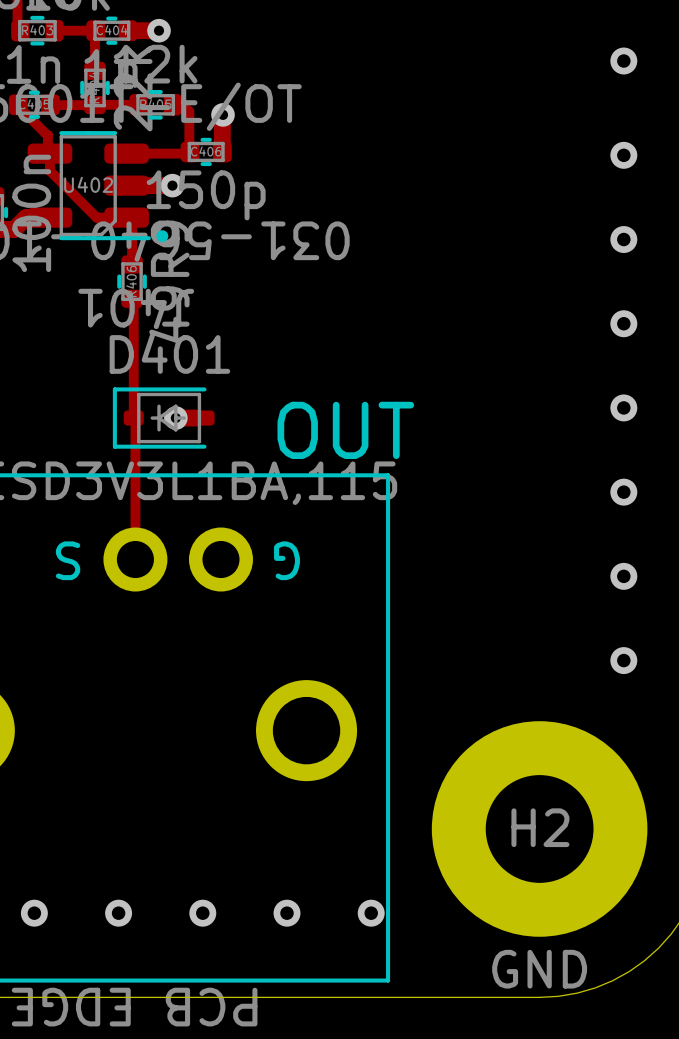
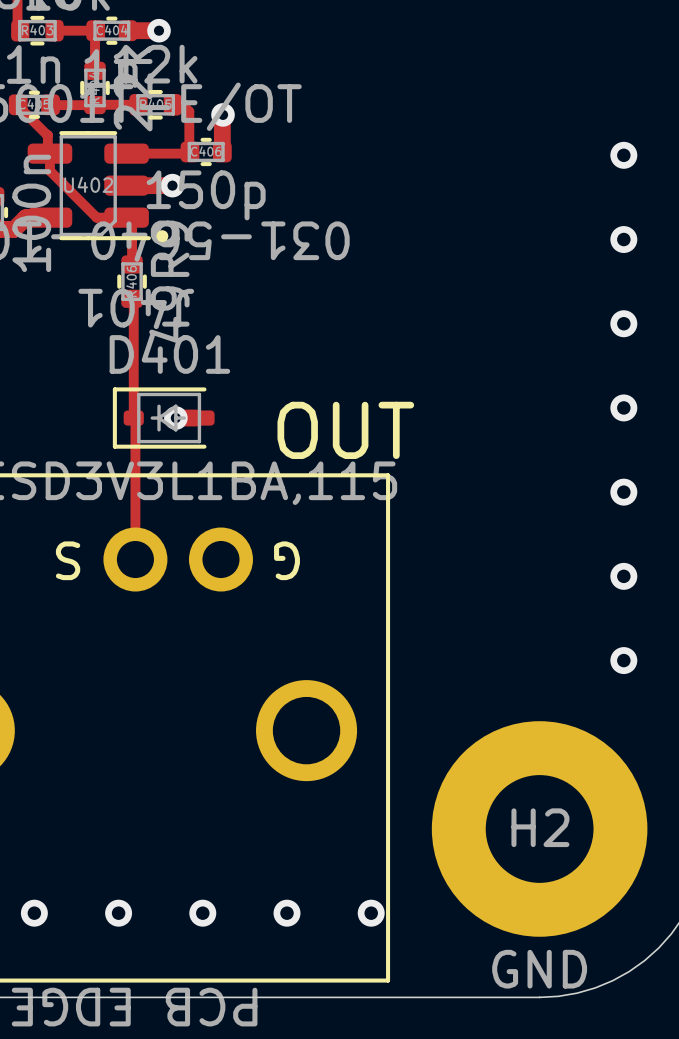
via: (623, 61) -> none

